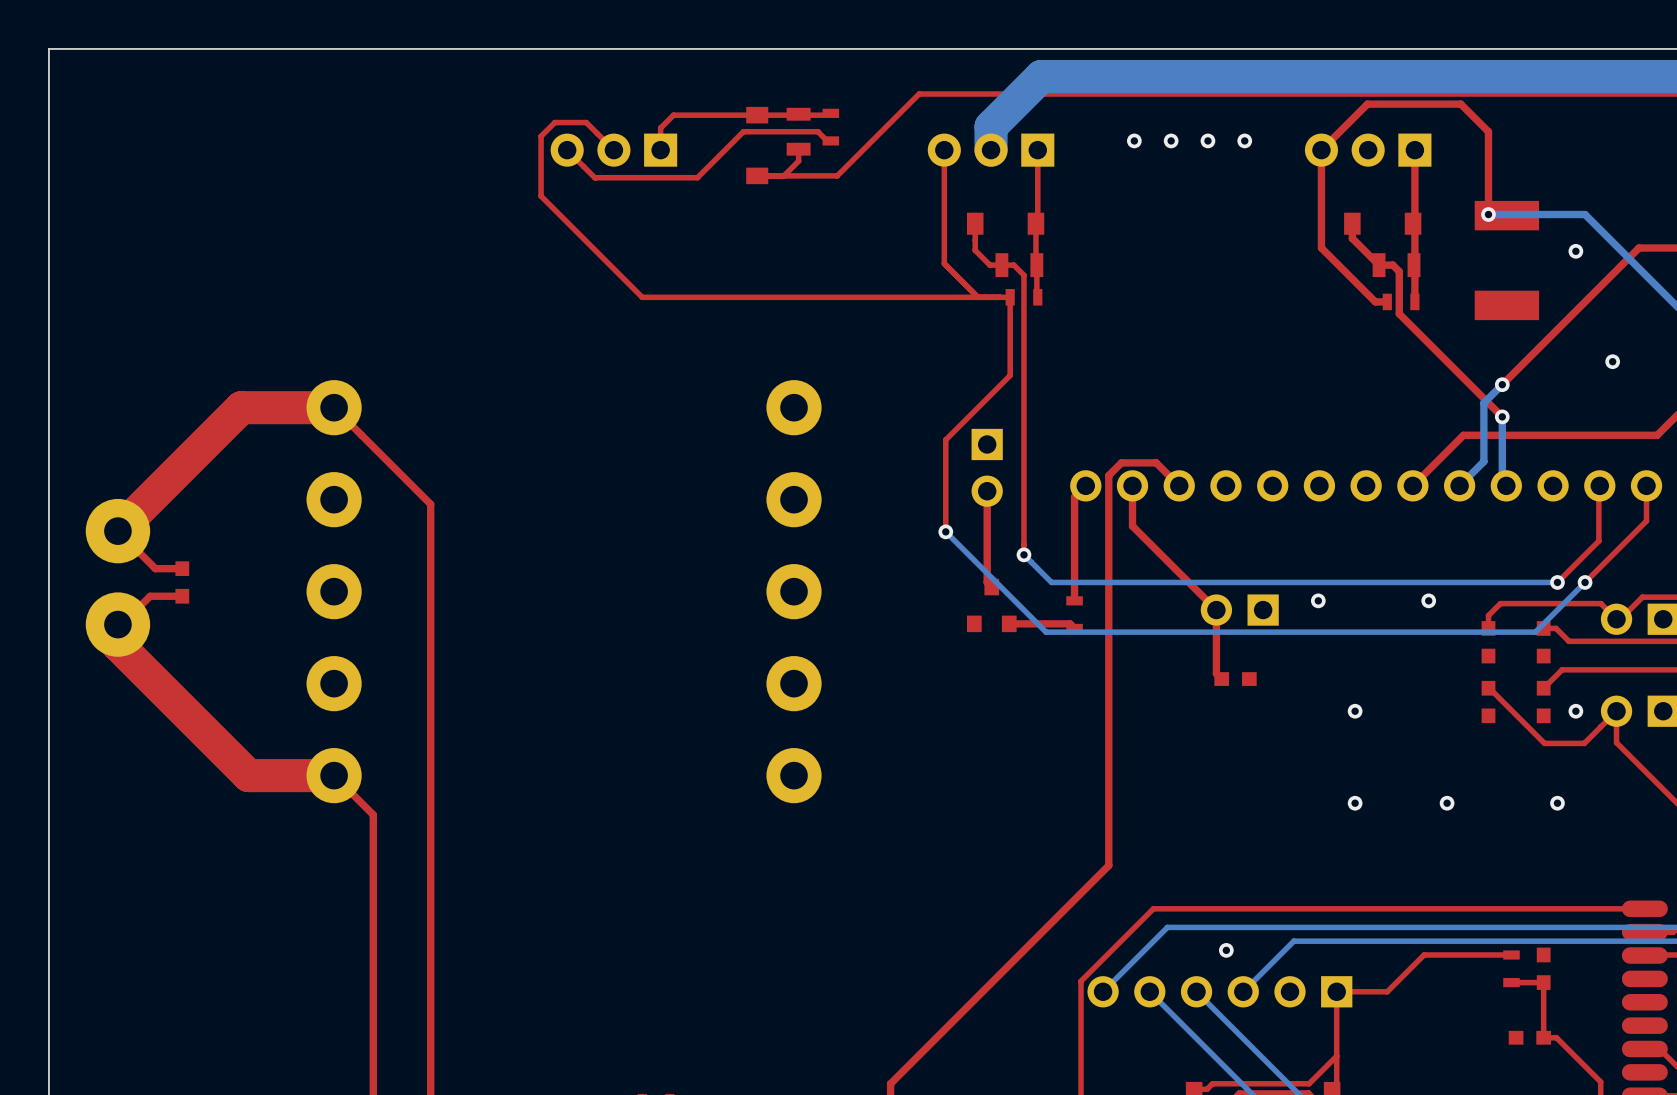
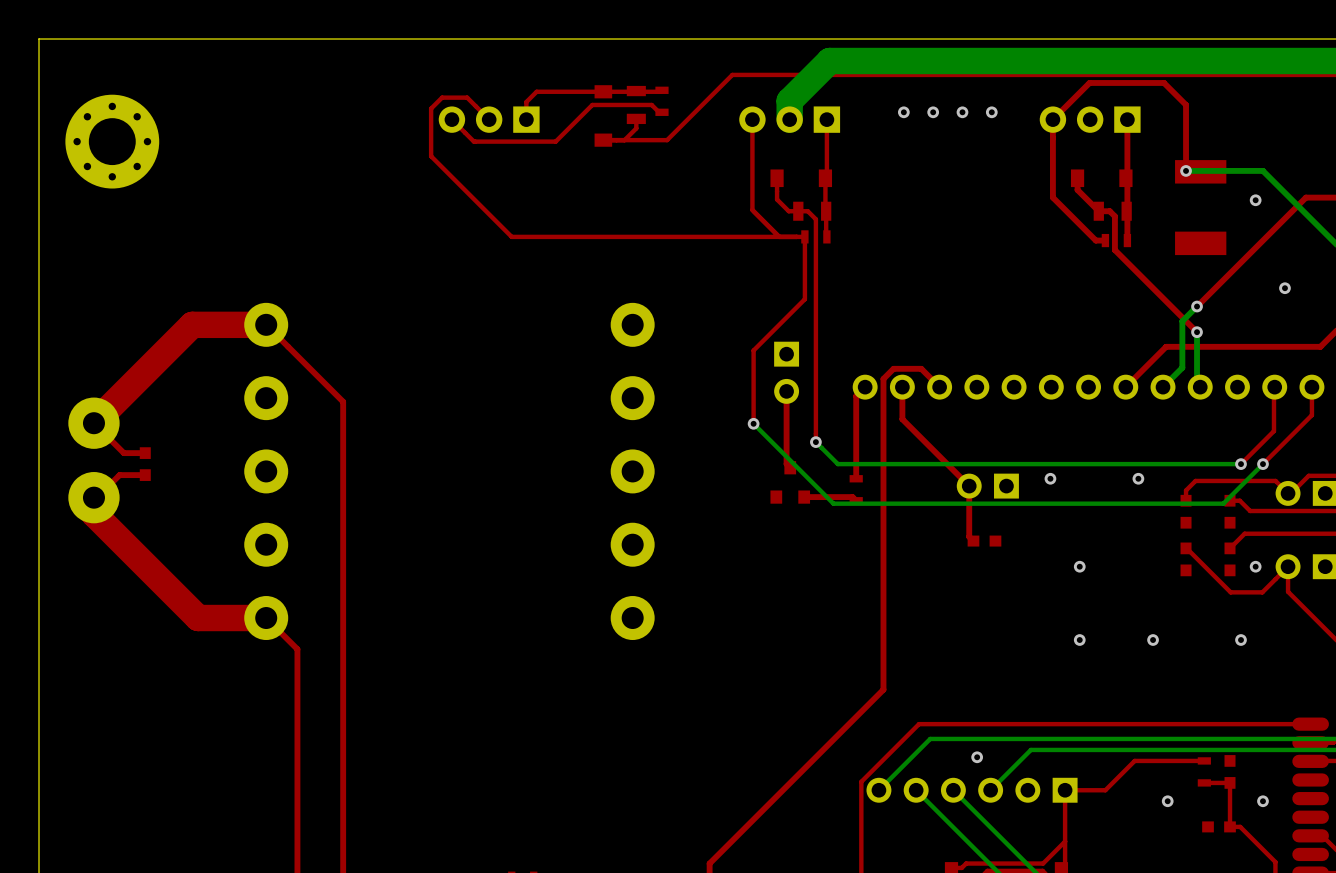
part: none -> (112, 141)
via: none -> (1167, 801)
via: none -> (1262, 801)

